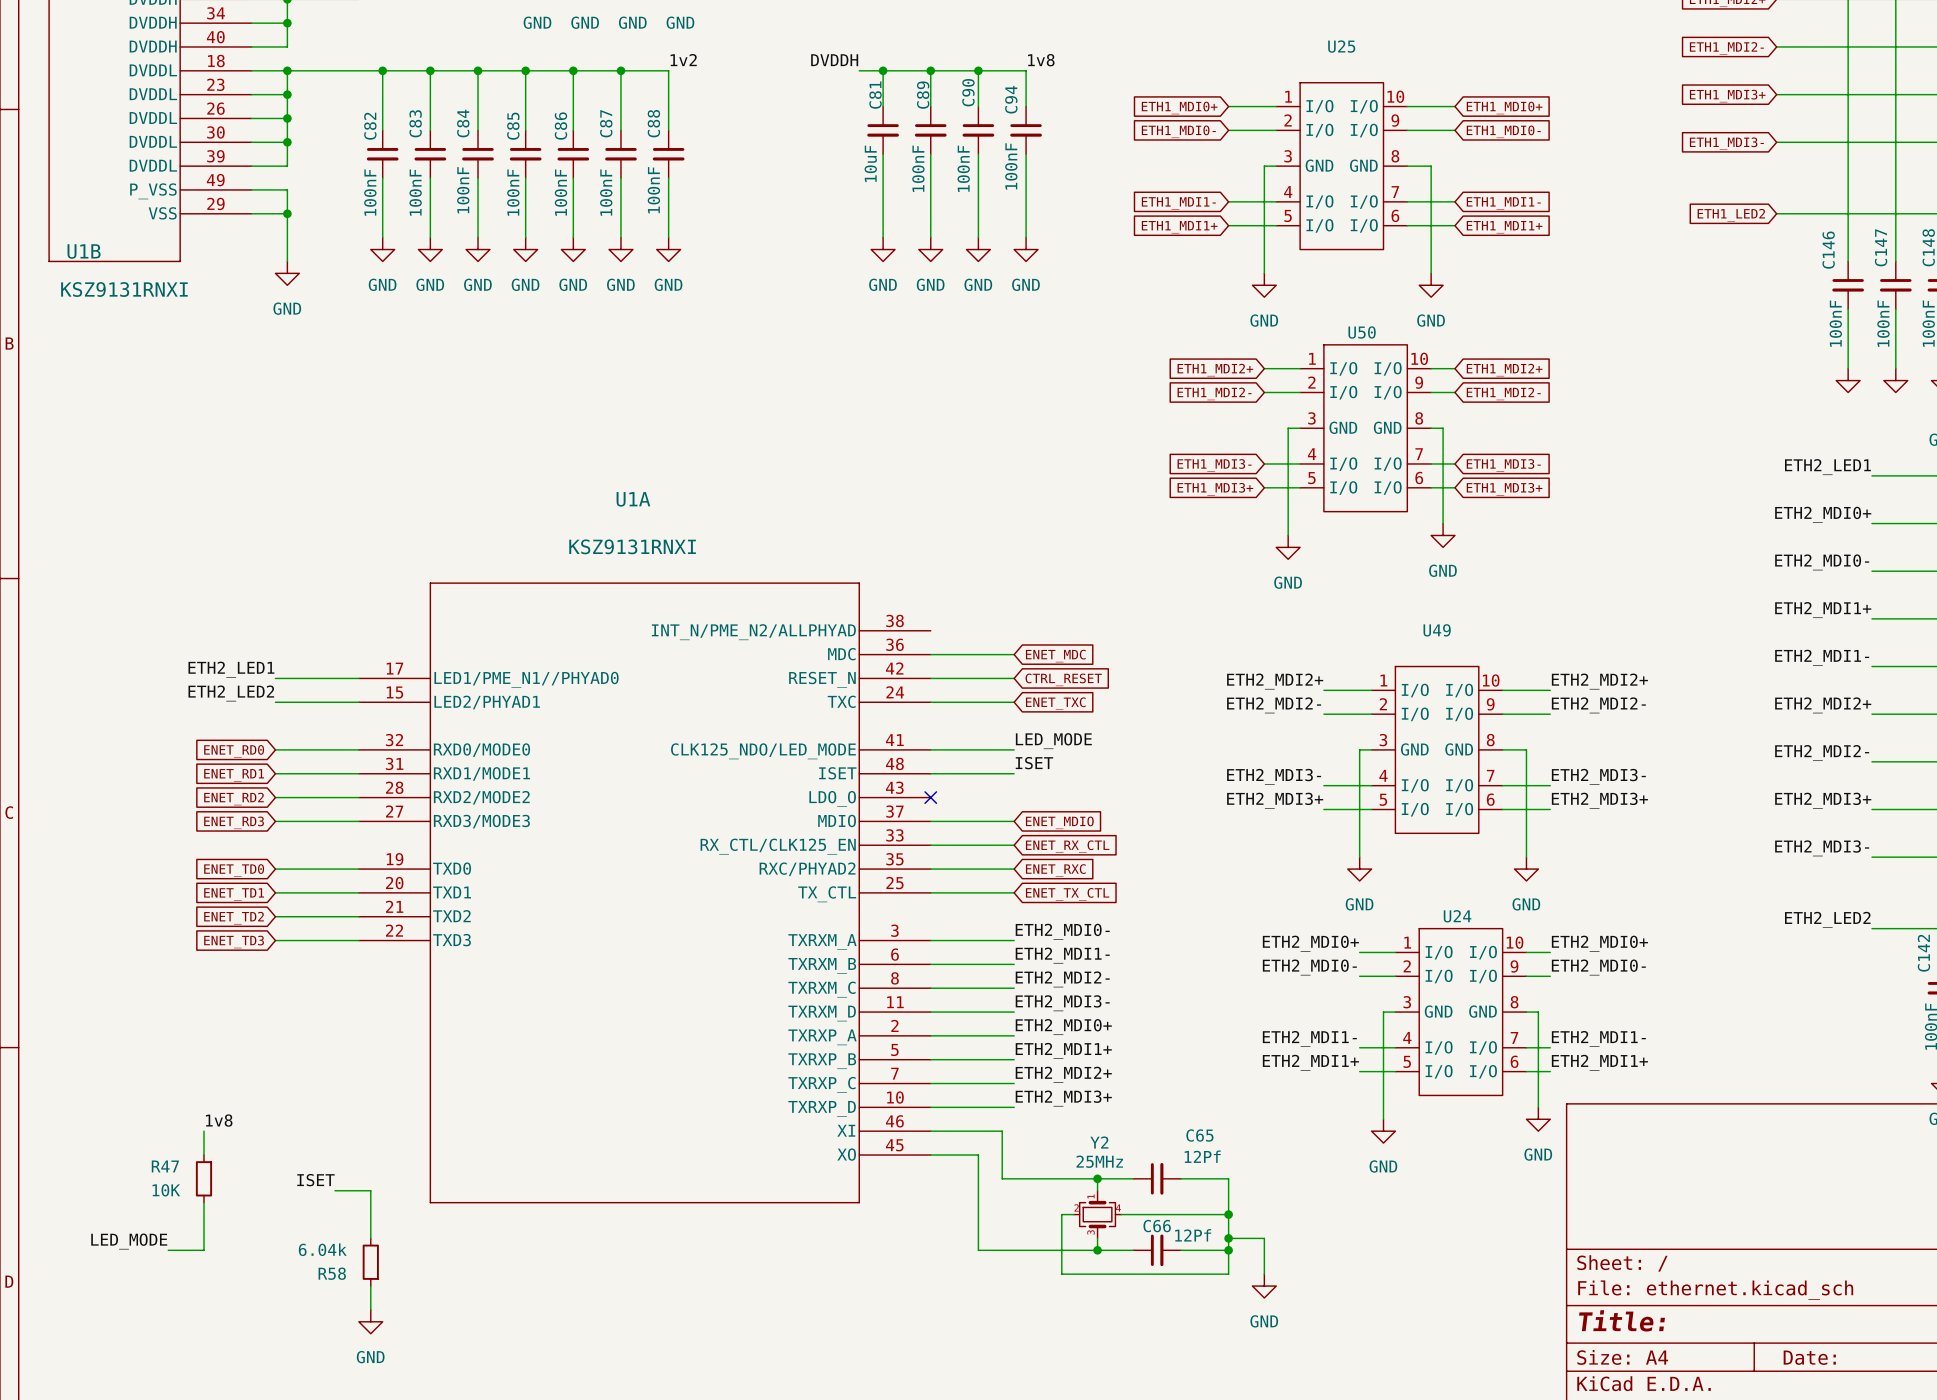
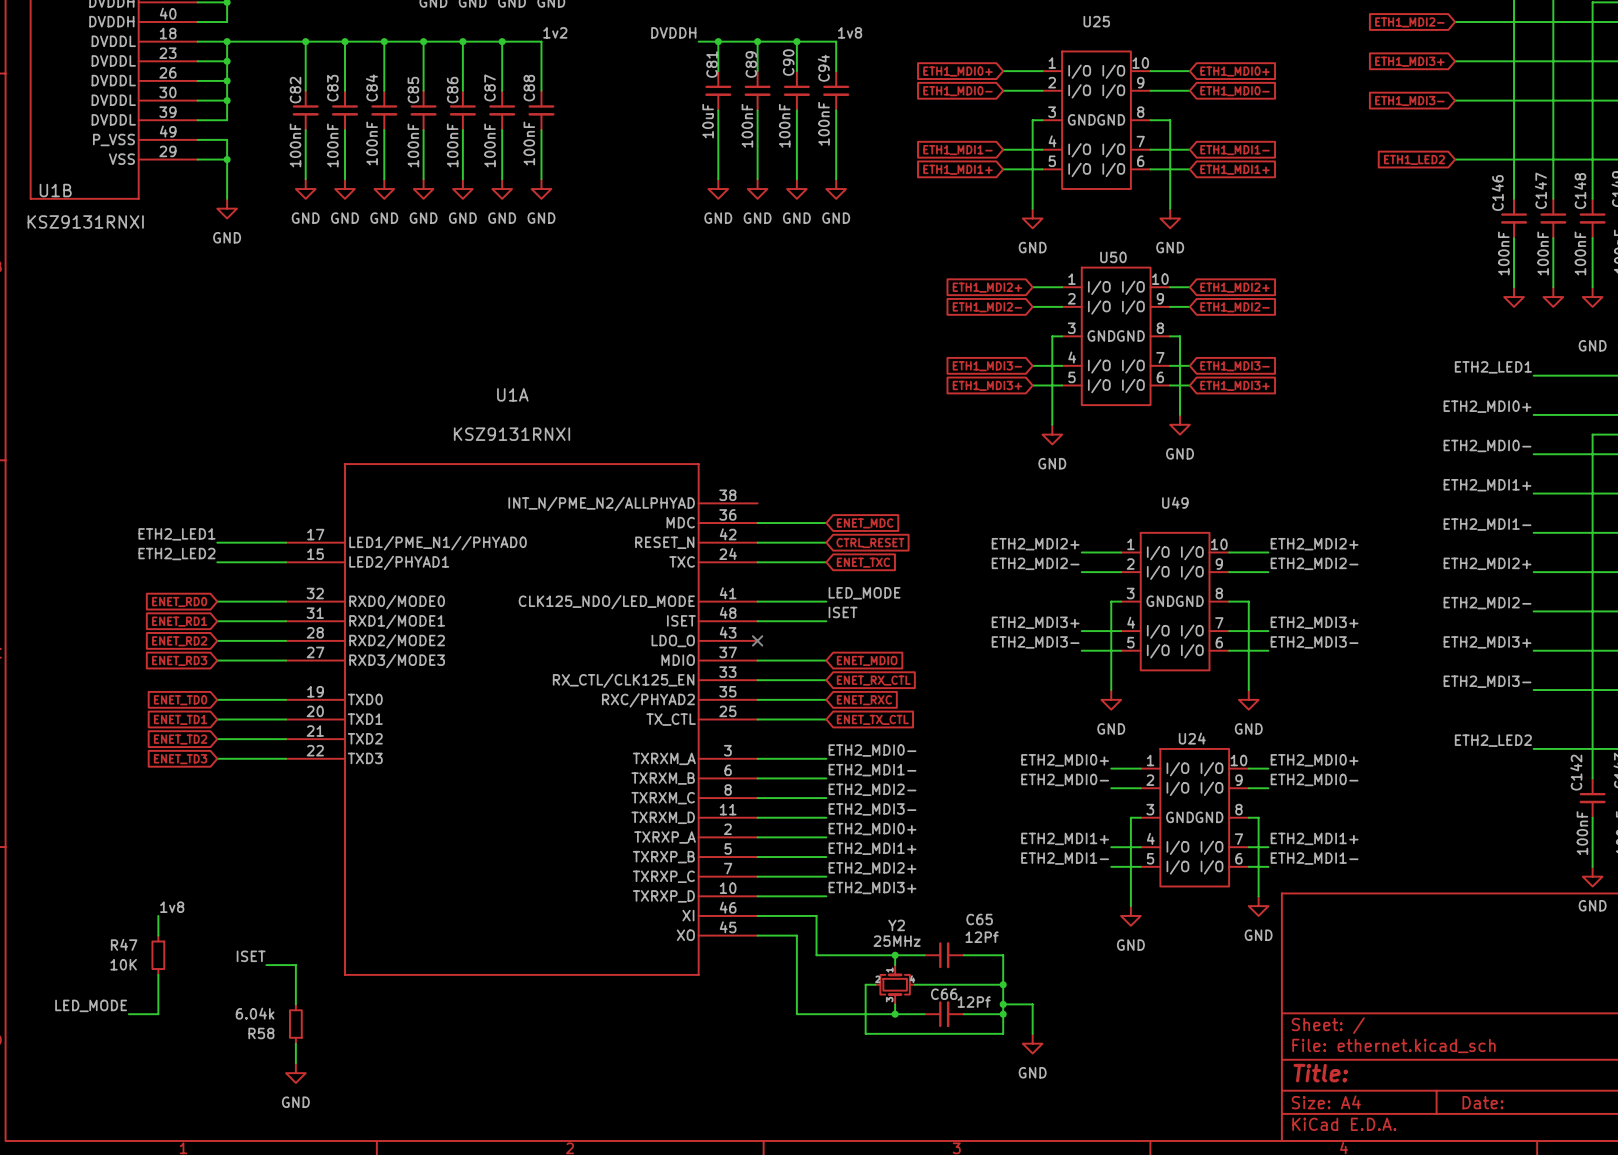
label: ETH2_MDI3- (1274, 776) -> ETH2_MDI3+ (1035, 622)
label: ETH2_MDI3- (1598, 776) -> ETH2_MDI3+ (1314, 622)
label: ETH2_MDI3+ (1275, 800) -> ETH2_MDI3- (1035, 642)
label: ETH2_MDI3+ (1599, 800) -> ETH2_MDI3- (1314, 642)
label: ETH2_MDI1- (1309, 1038) -> ETH2_MDI1+ (1065, 838)
label: ETH2_MDI1- (1598, 1038) -> ETH2_MDI1+ (1314, 838)
label: ETH2_MDI1+ (1310, 1062) -> ETH2_MDI1- (1065, 858)
label: ETH2_MDI1+ (1599, 1062) -> ETH2_MDI1- (1314, 858)

